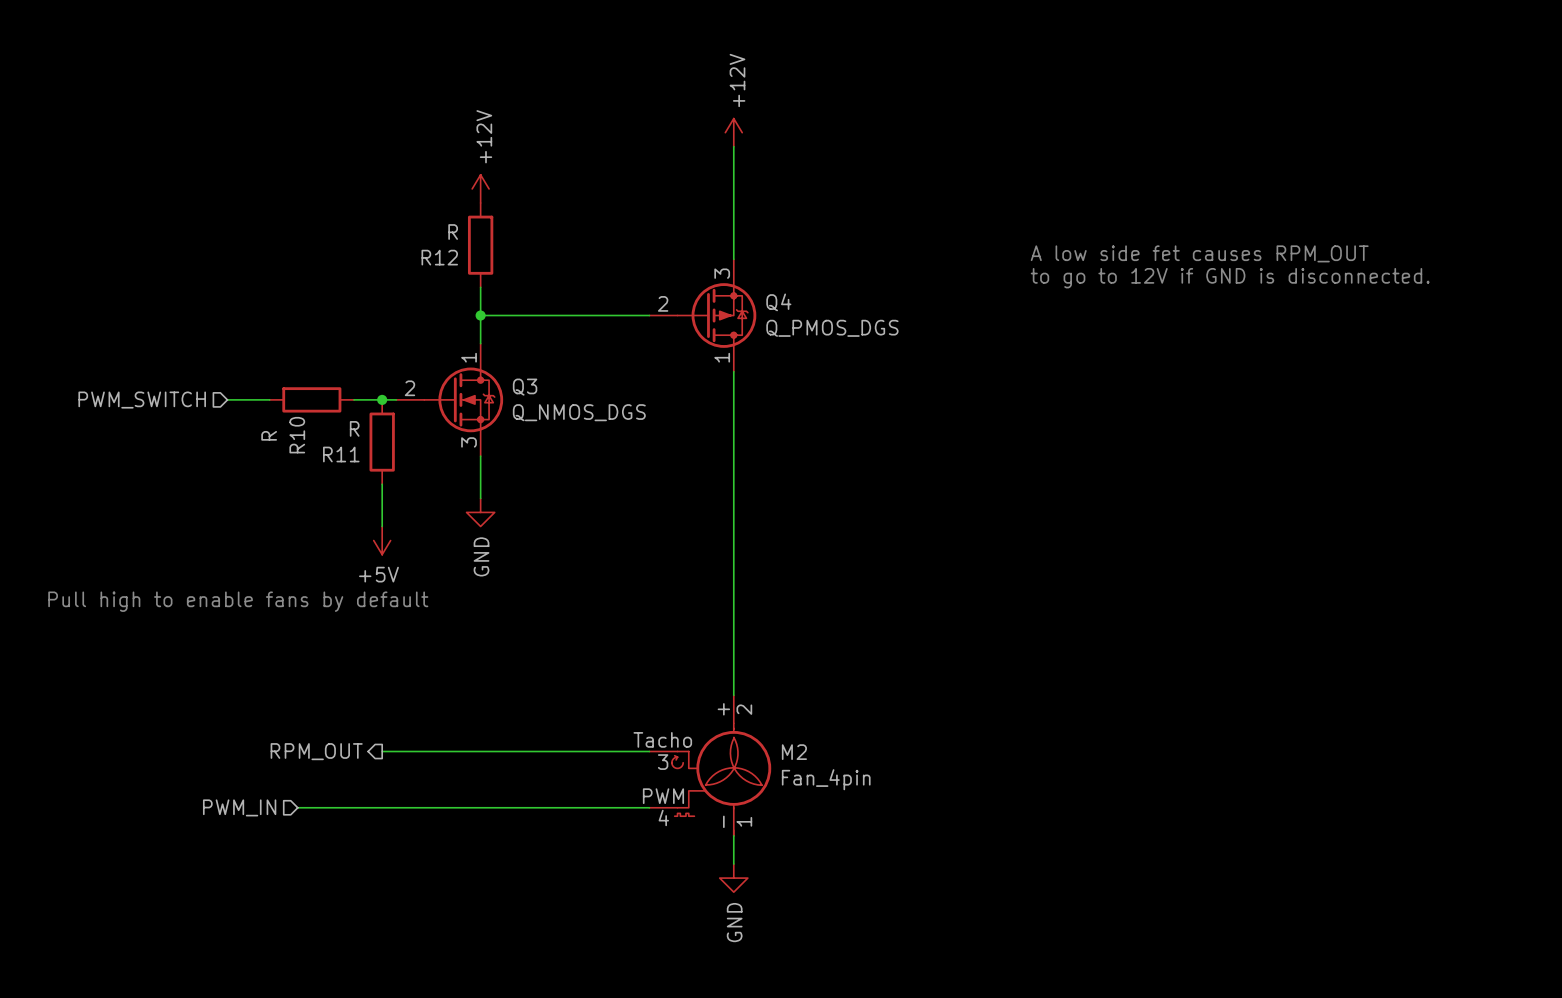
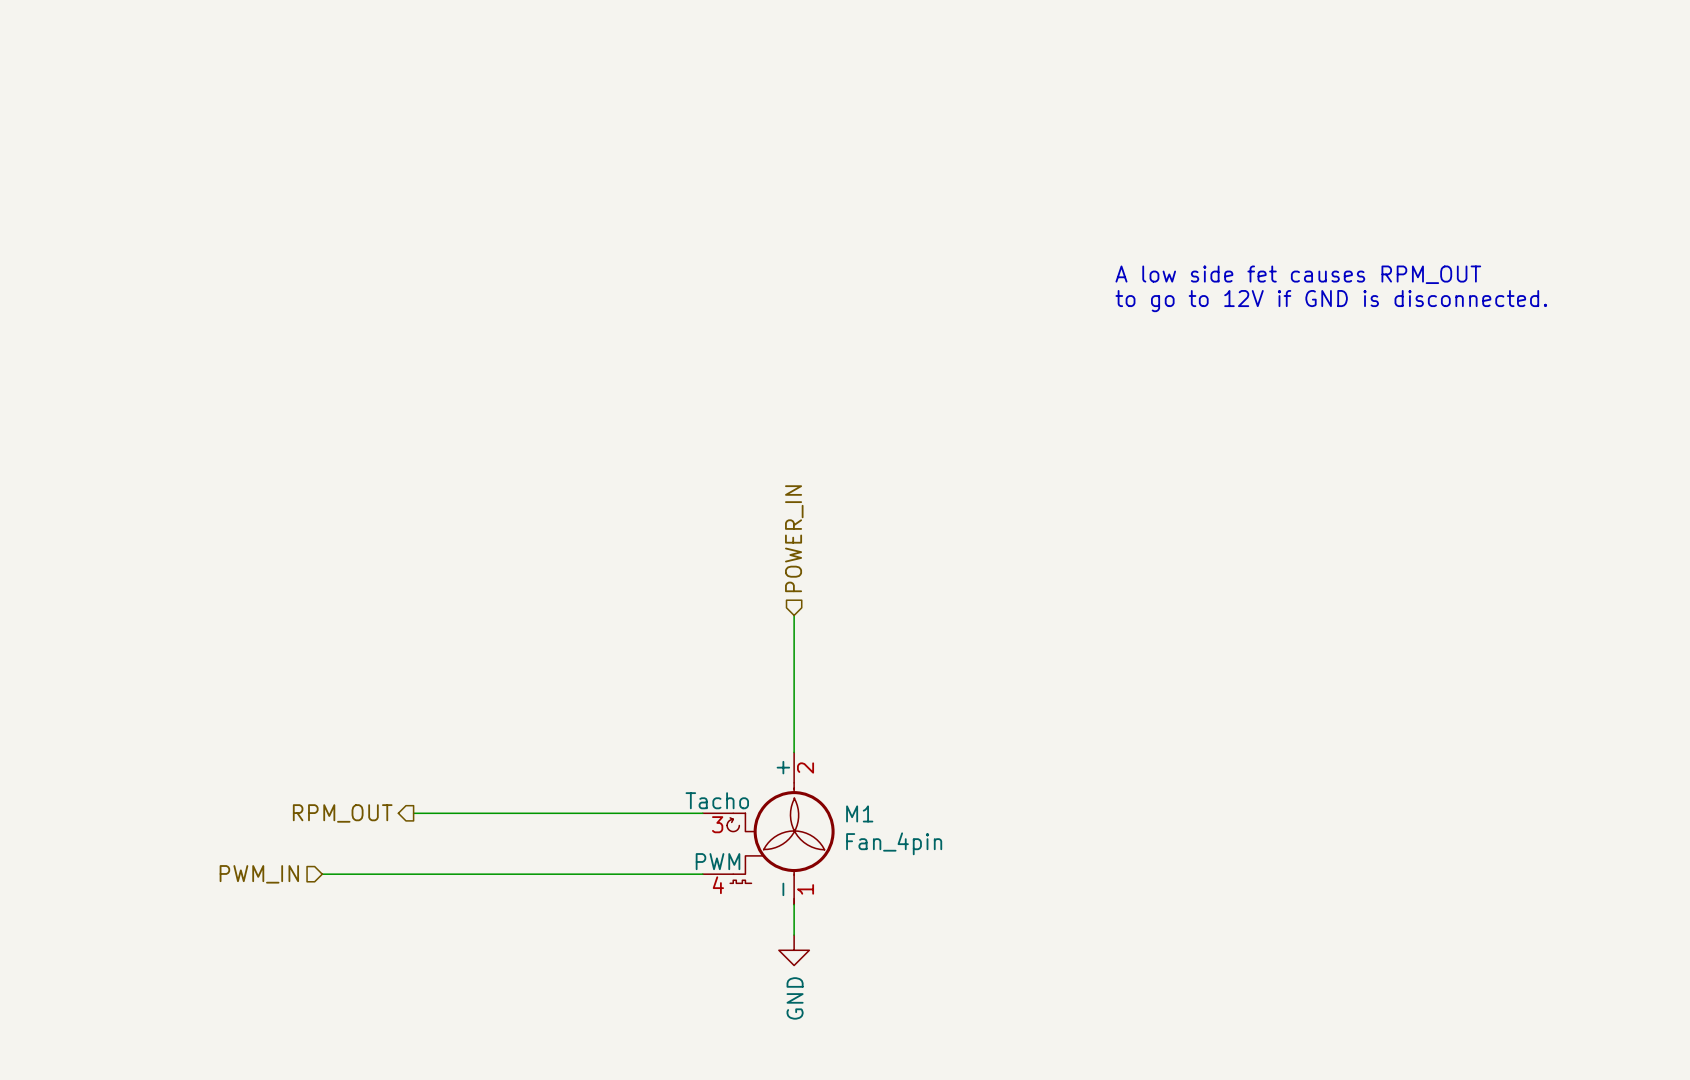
power symbol: +12V (733, 132) -> none
wire: (733, 146) (733, 259) -> none
power symbol: +12V (480, 188) -> none
R12: R (480, 245) -> none
wire: (480, 287) (480, 343) -> none
wire: (480, 315) (649, 315) -> none
junction: (480, 315) -> none
Q4: Q_PMOS_DGS (702, 315) -> none
wire: (733, 371) (733, 568) -> none
wire: (227, 399) (269, 399) -> none
R10: R (311, 399) -> none
wire: (354, 399) (396, 399) -> none
junction: (382, 399) -> none
Q3: Q_NMOS_DGS (449, 399) -> none
hierarchical label: PWM_SWITCH (142, 400) -> none
R11: R (382, 442) -> none
wire: (480, 456) (480, 498) -> none
wire: (382, 484) (382, 526) -> none
hierarchical label: none -> POWER_IN (794, 538)
power symbol: GND (480, 512) -> none
power symbol: +5V (382, 540) -> none
text: Pull high to enable fans by default (238, 601) -> none
M2 name: M2 (794, 752) -> M1 (859, 813)

